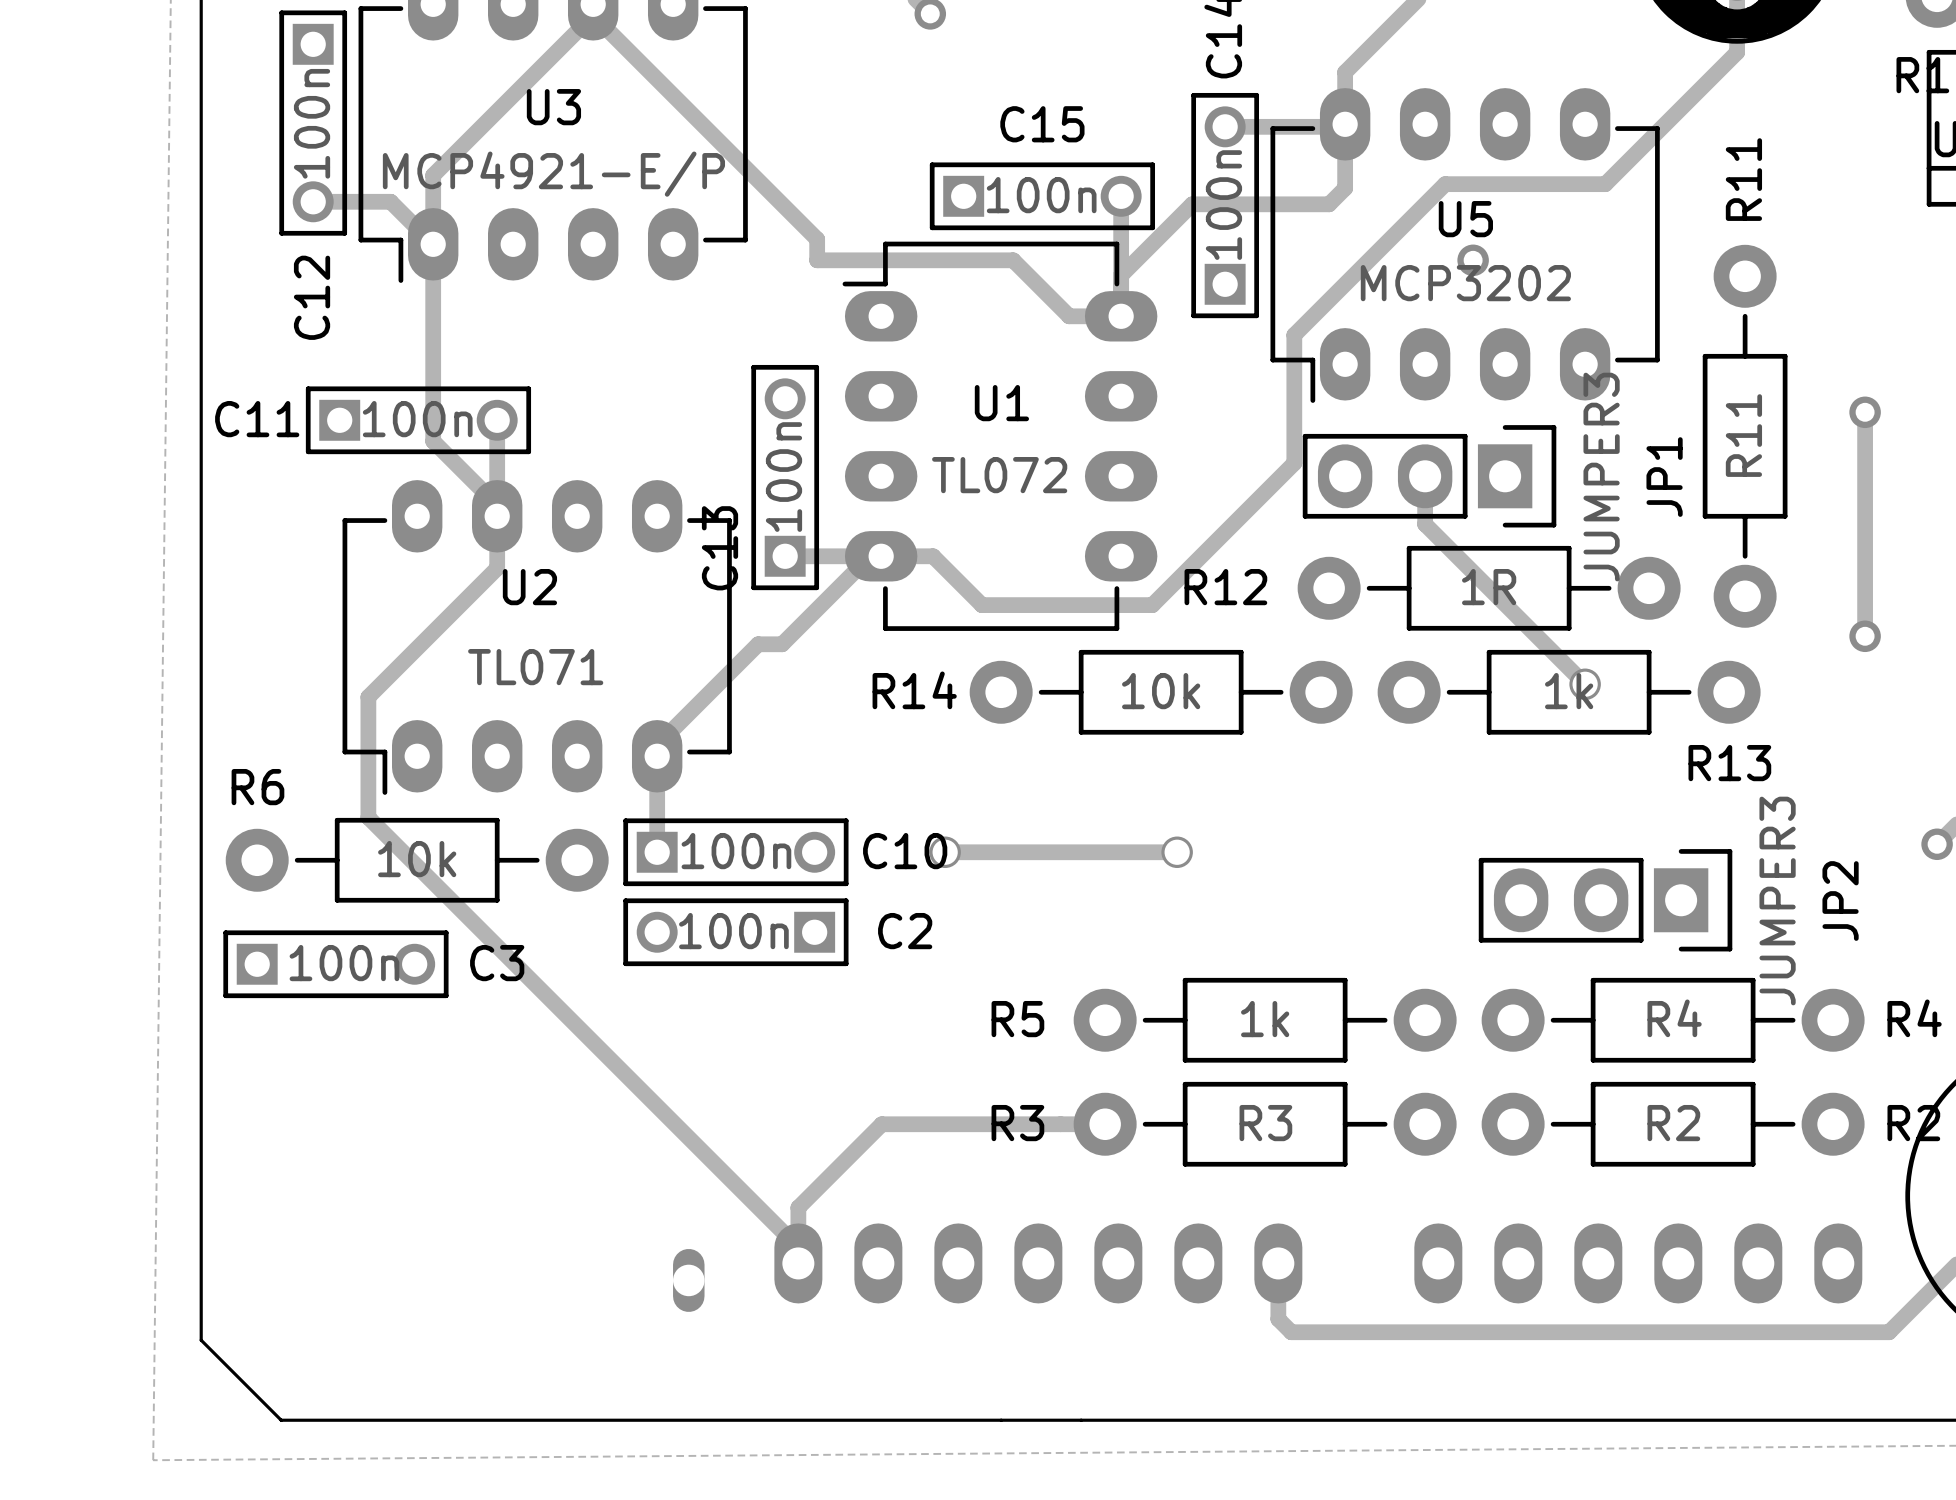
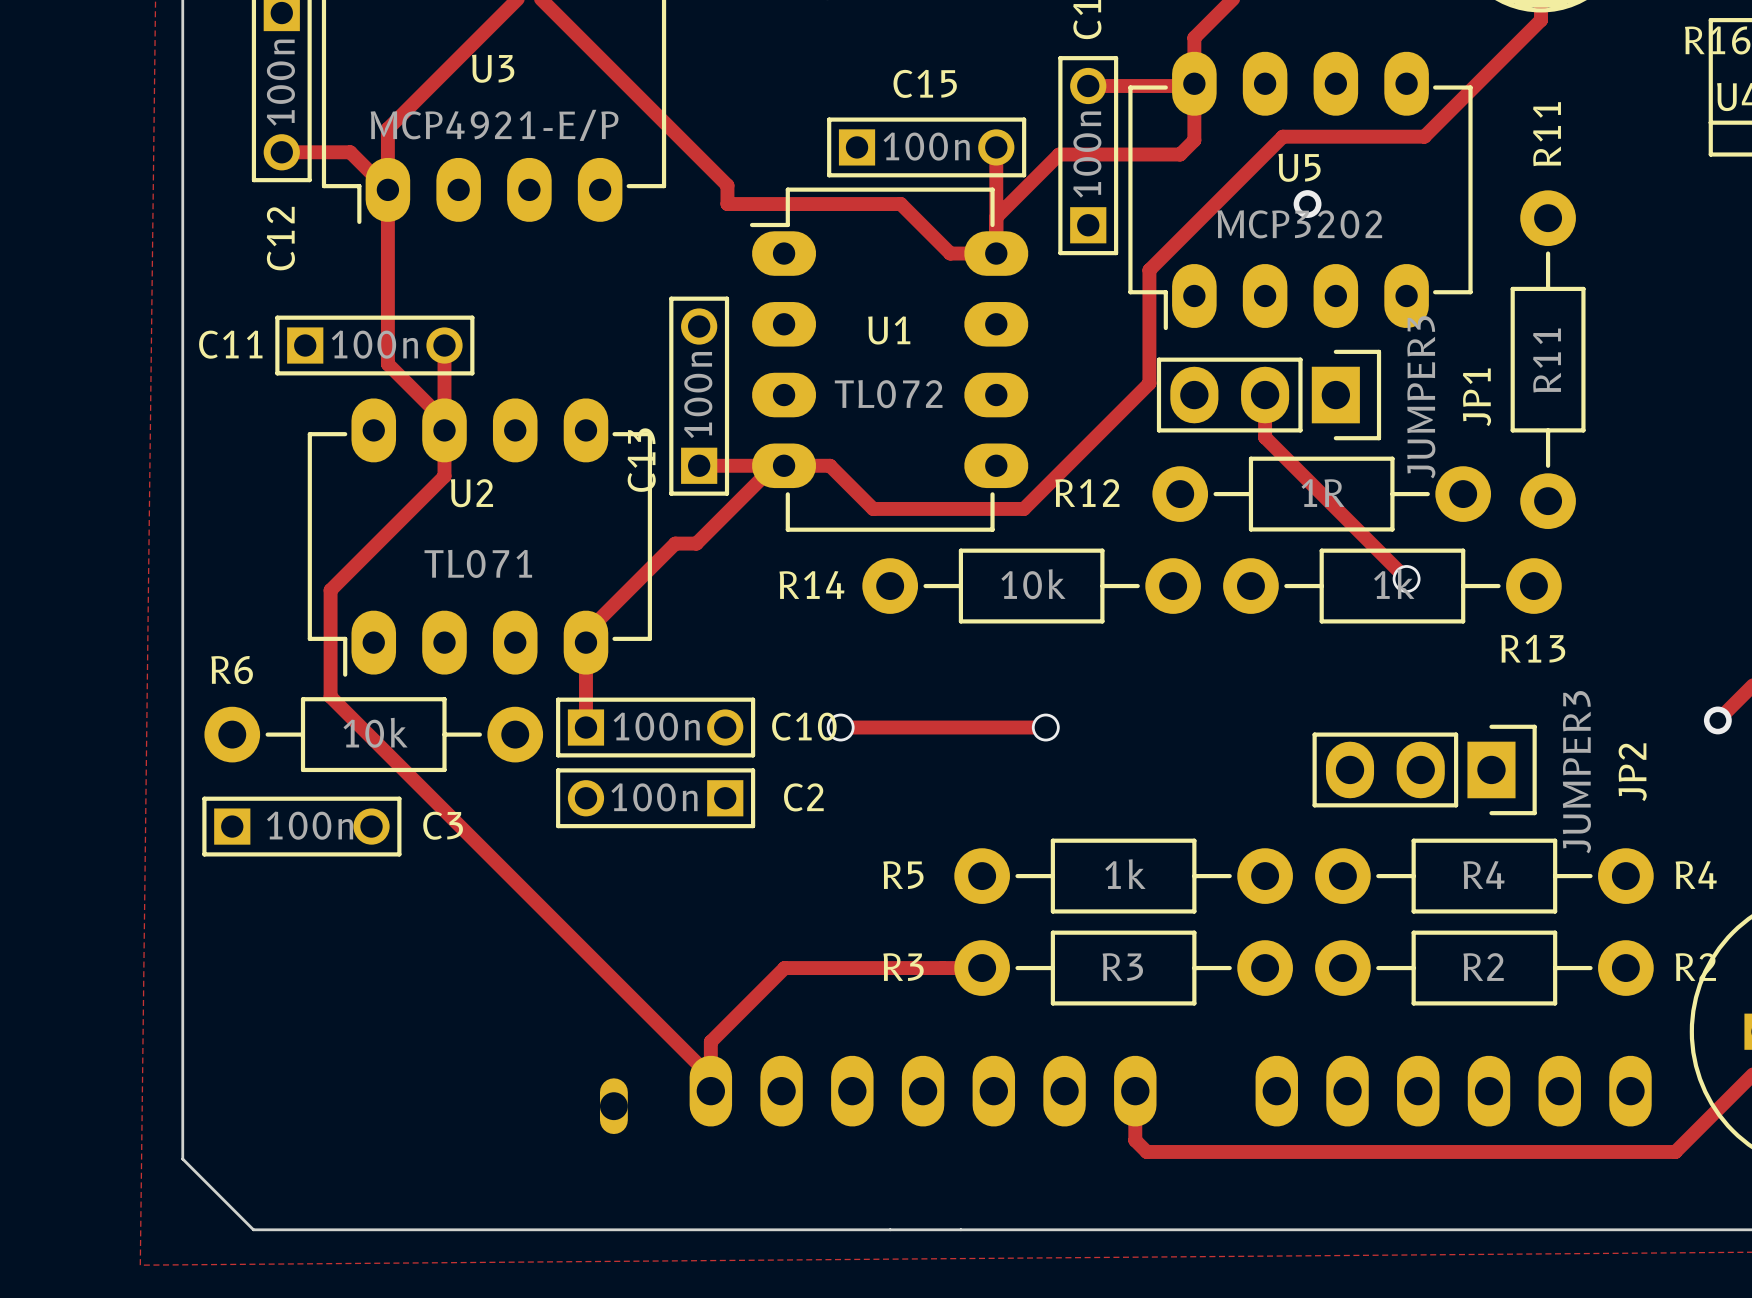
track: (1865, 412) (1865, 636) -> none
via: (1865, 412) -> none
via: (1865, 636) -> none

